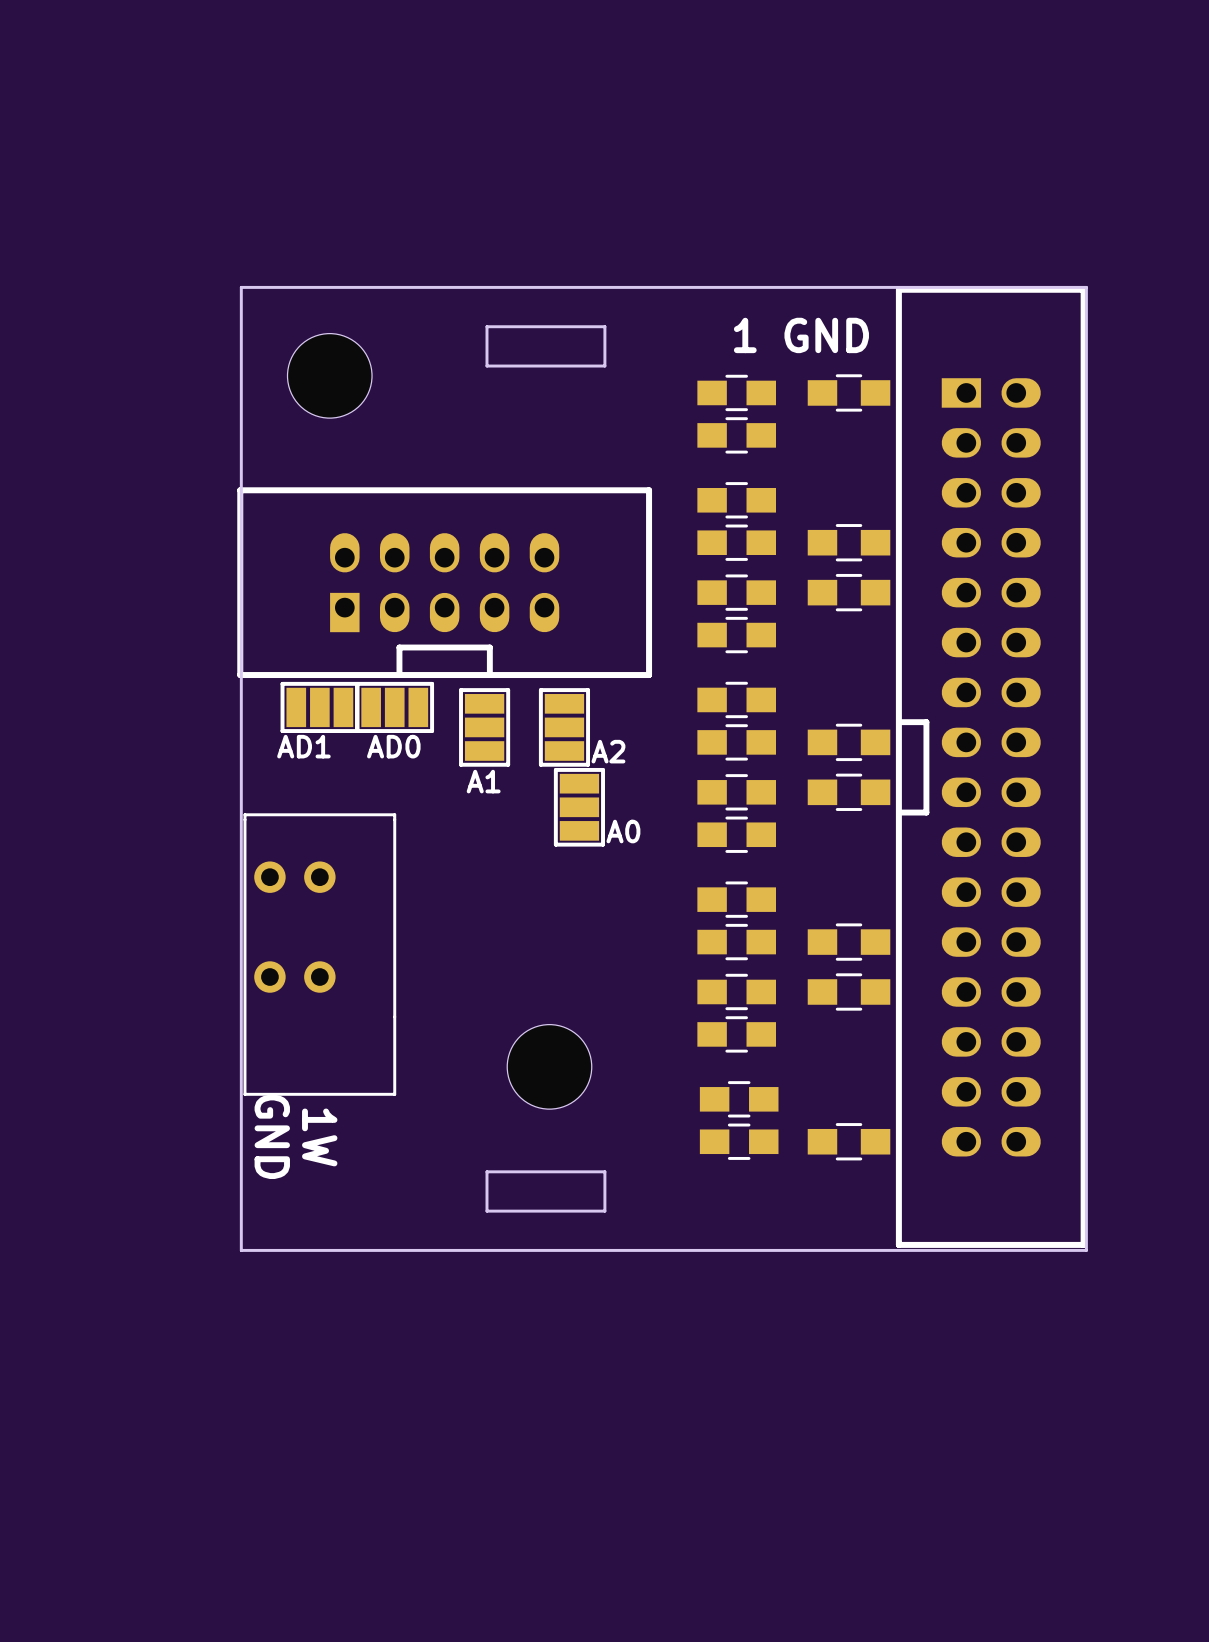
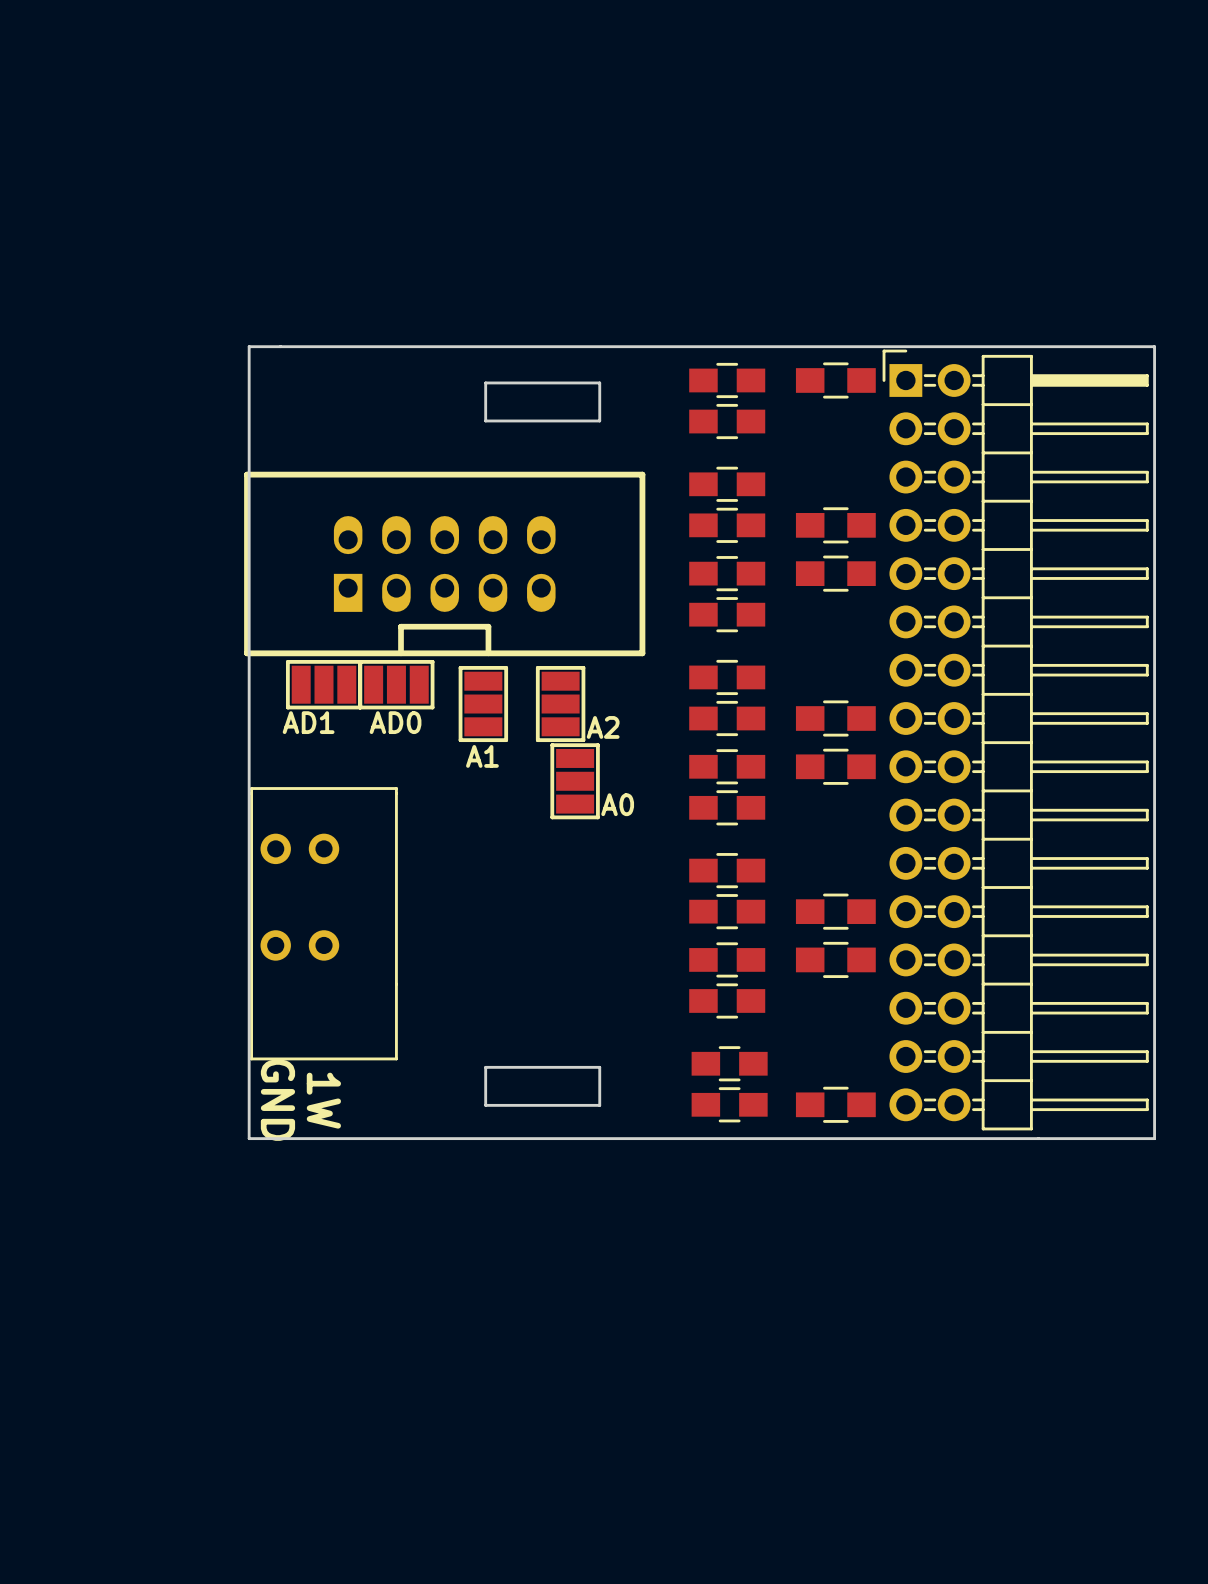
board edge: (241, 287) (1086, 287) (1086, 1250) (241, 1250) (241, 287) -> (249, 346) (249, 1138) (1154, 1138) (1154, 346) (249, 346)
board edge: (486, 326) (486, 366) (604, 366) (604, 326) (486, 326) -> (485, 382) (485, 420) (599, 420) (599, 382) (485, 382)
text: 1 GND (801, 335) -> none
part: (329, 375) -> none
part: none -> (1015, 739)
part: (991, 767) -> none
part: (549, 1066) -> none
board edge: (486, 1171) (486, 1211) (604, 1211) (604, 1171) (486, 1171) -> (485, 1067) (485, 1105) (599, 1105) (599, 1067) (485, 1067)

